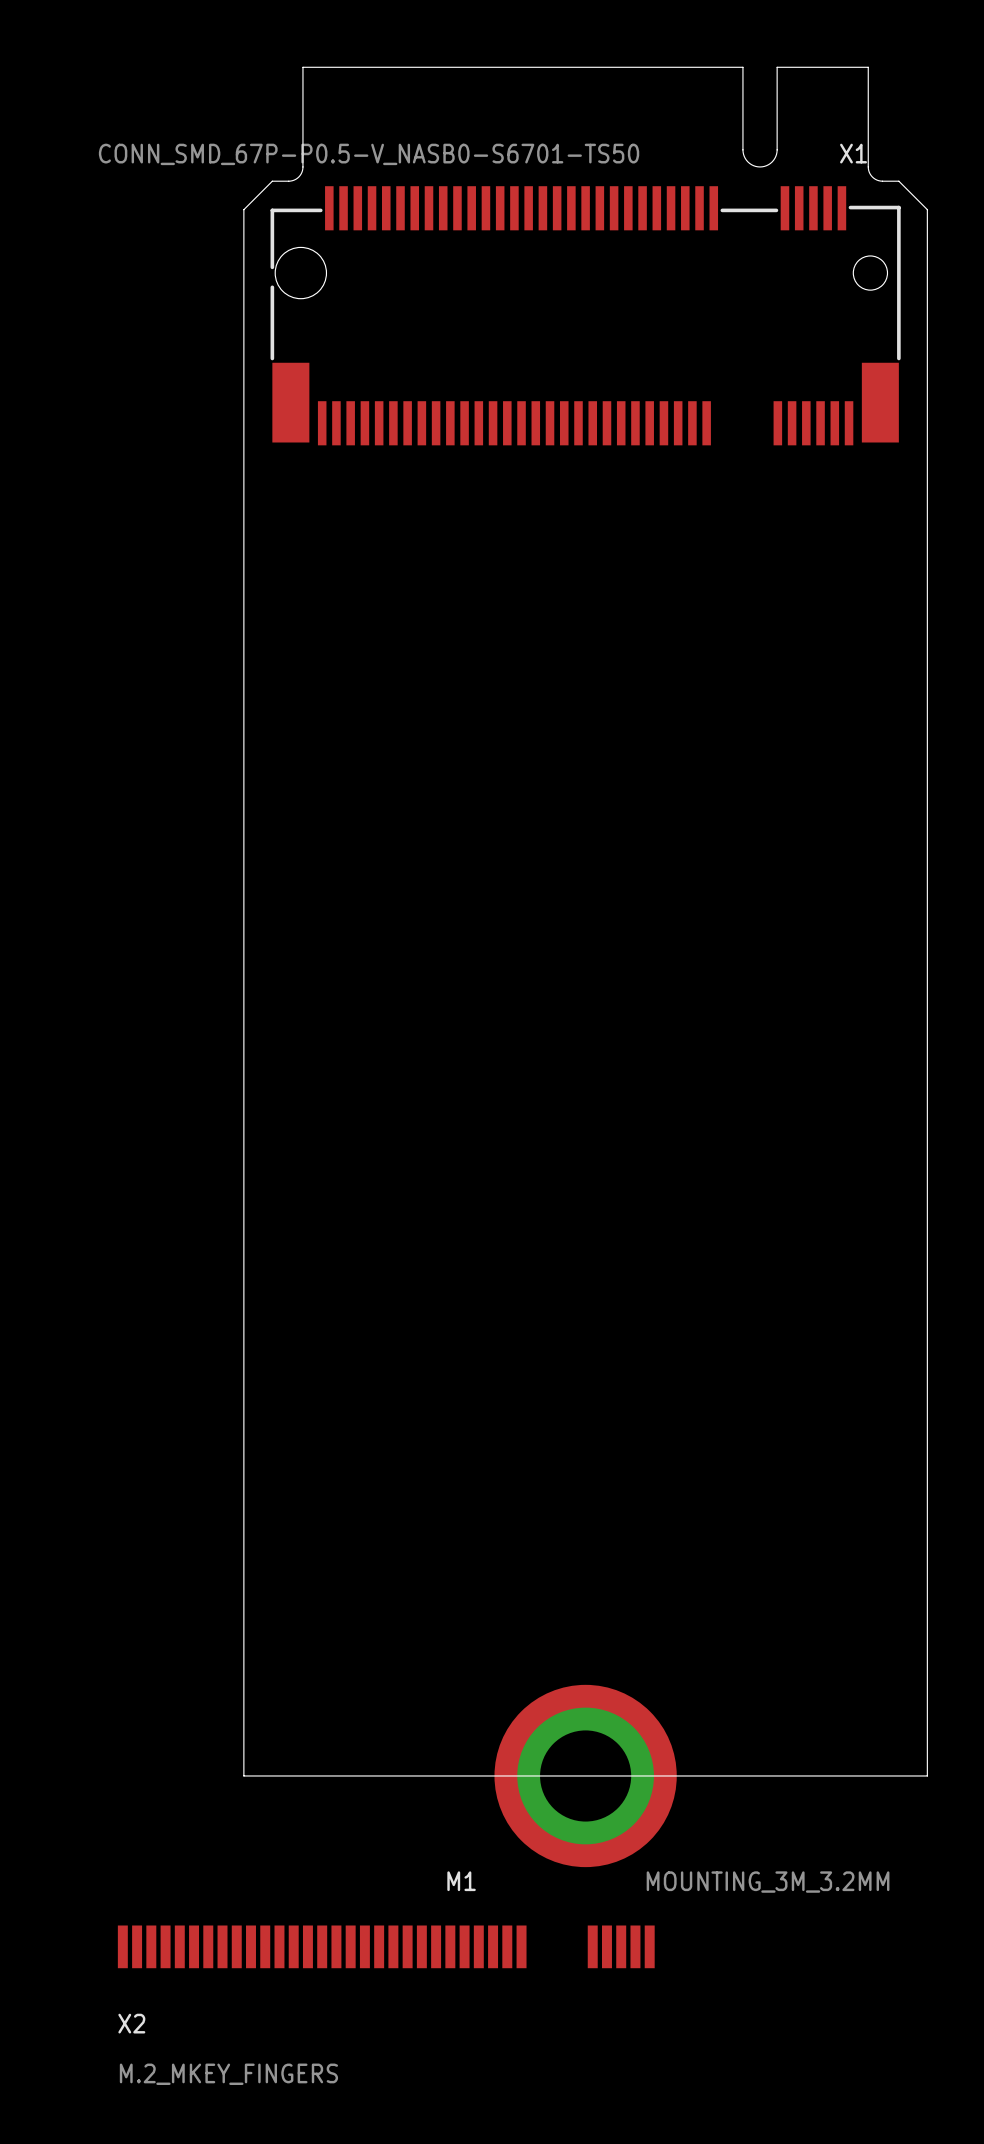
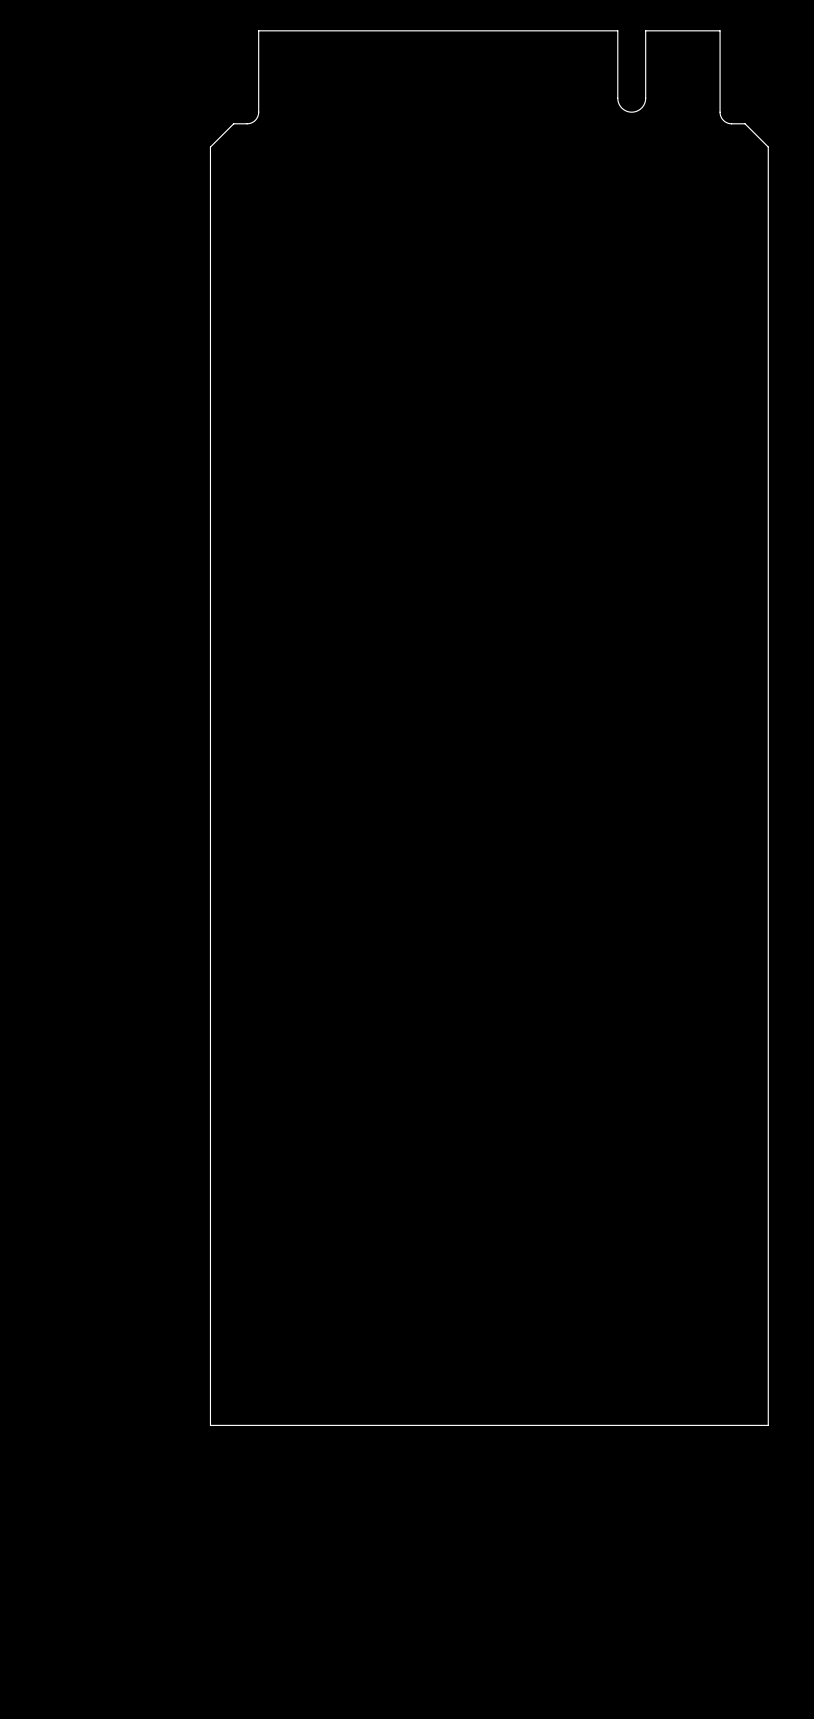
X1: CONN_SMD_67P-P0.5-V_NASB0-S6701-TS50 (585, 315) -> none
M1: MOUNTING_3M_3.2MM (585, 1775) -> none
X2: M.2_MKEY_FINGERS (386, 1946) -> none

